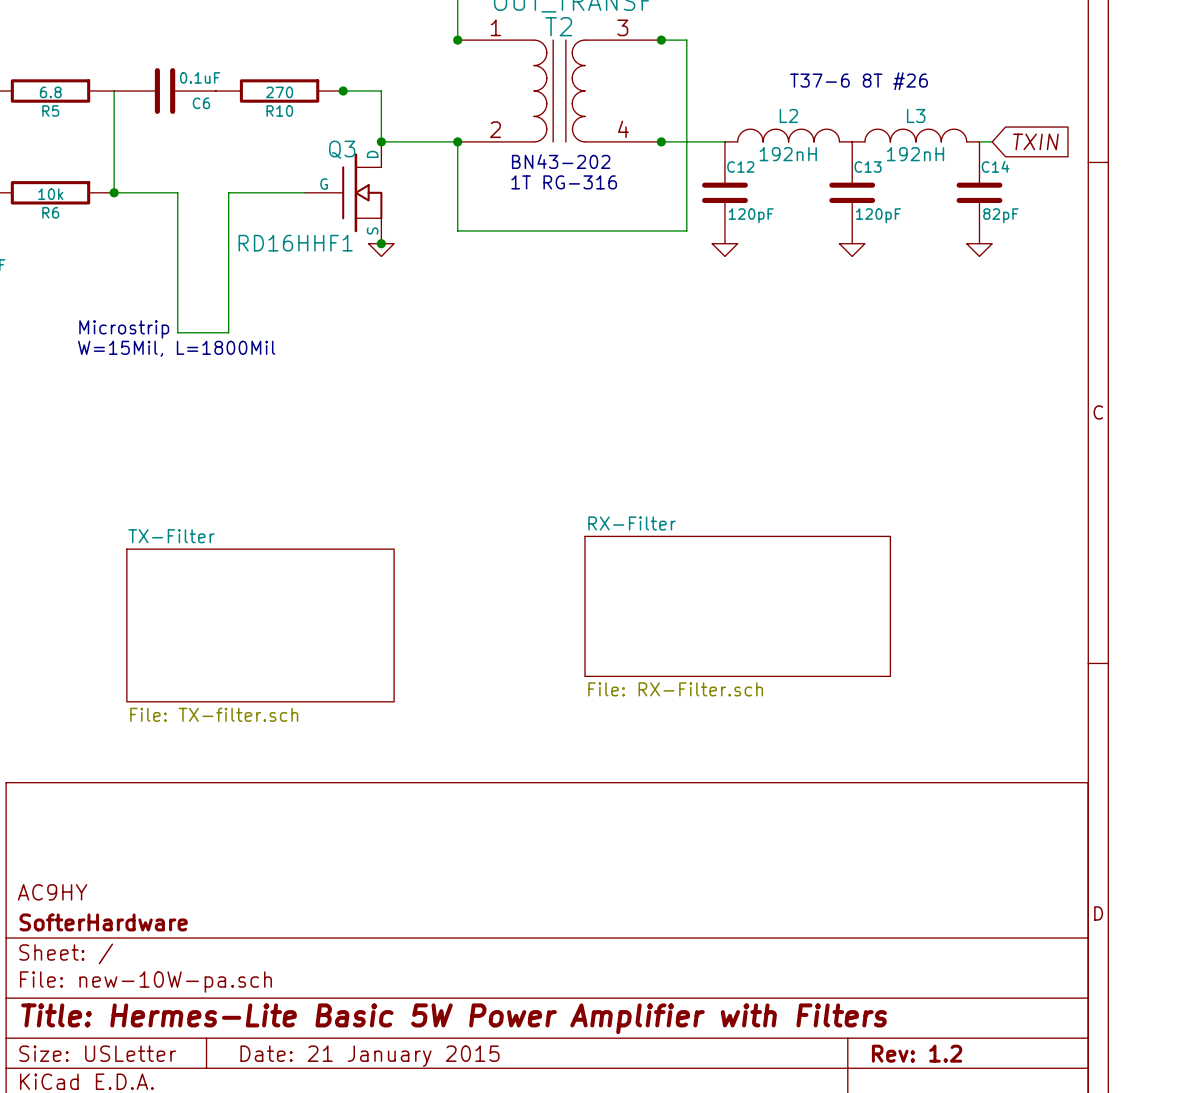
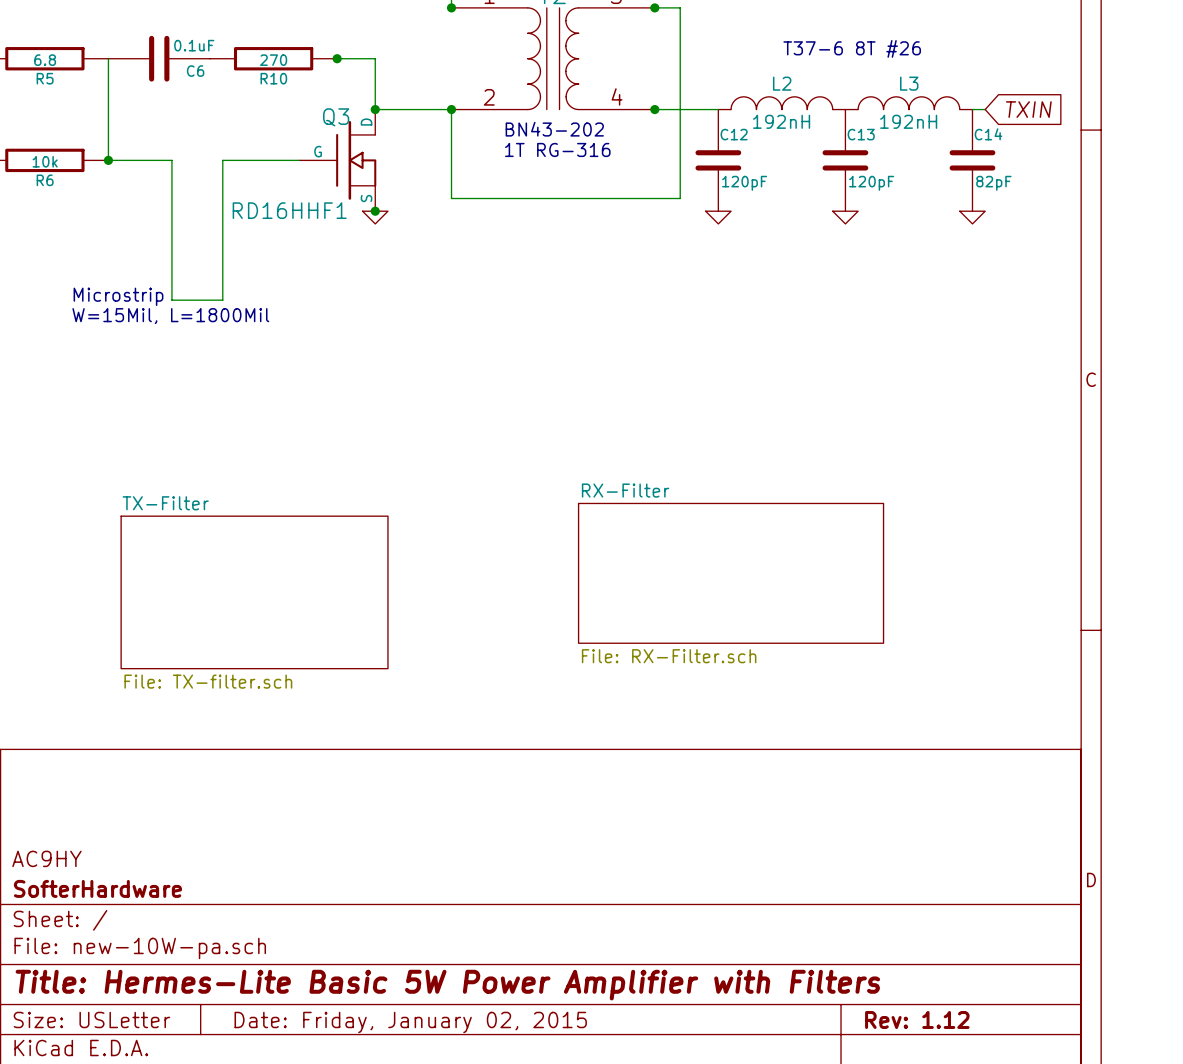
title block: Rev: 1.2 (917, 1053) -> Rev: 1.12 (917, 1019)
title block: Date: 21 January 2015 (369, 1056) -> Date: Friday, January 02, 2015 (410, 1022)

